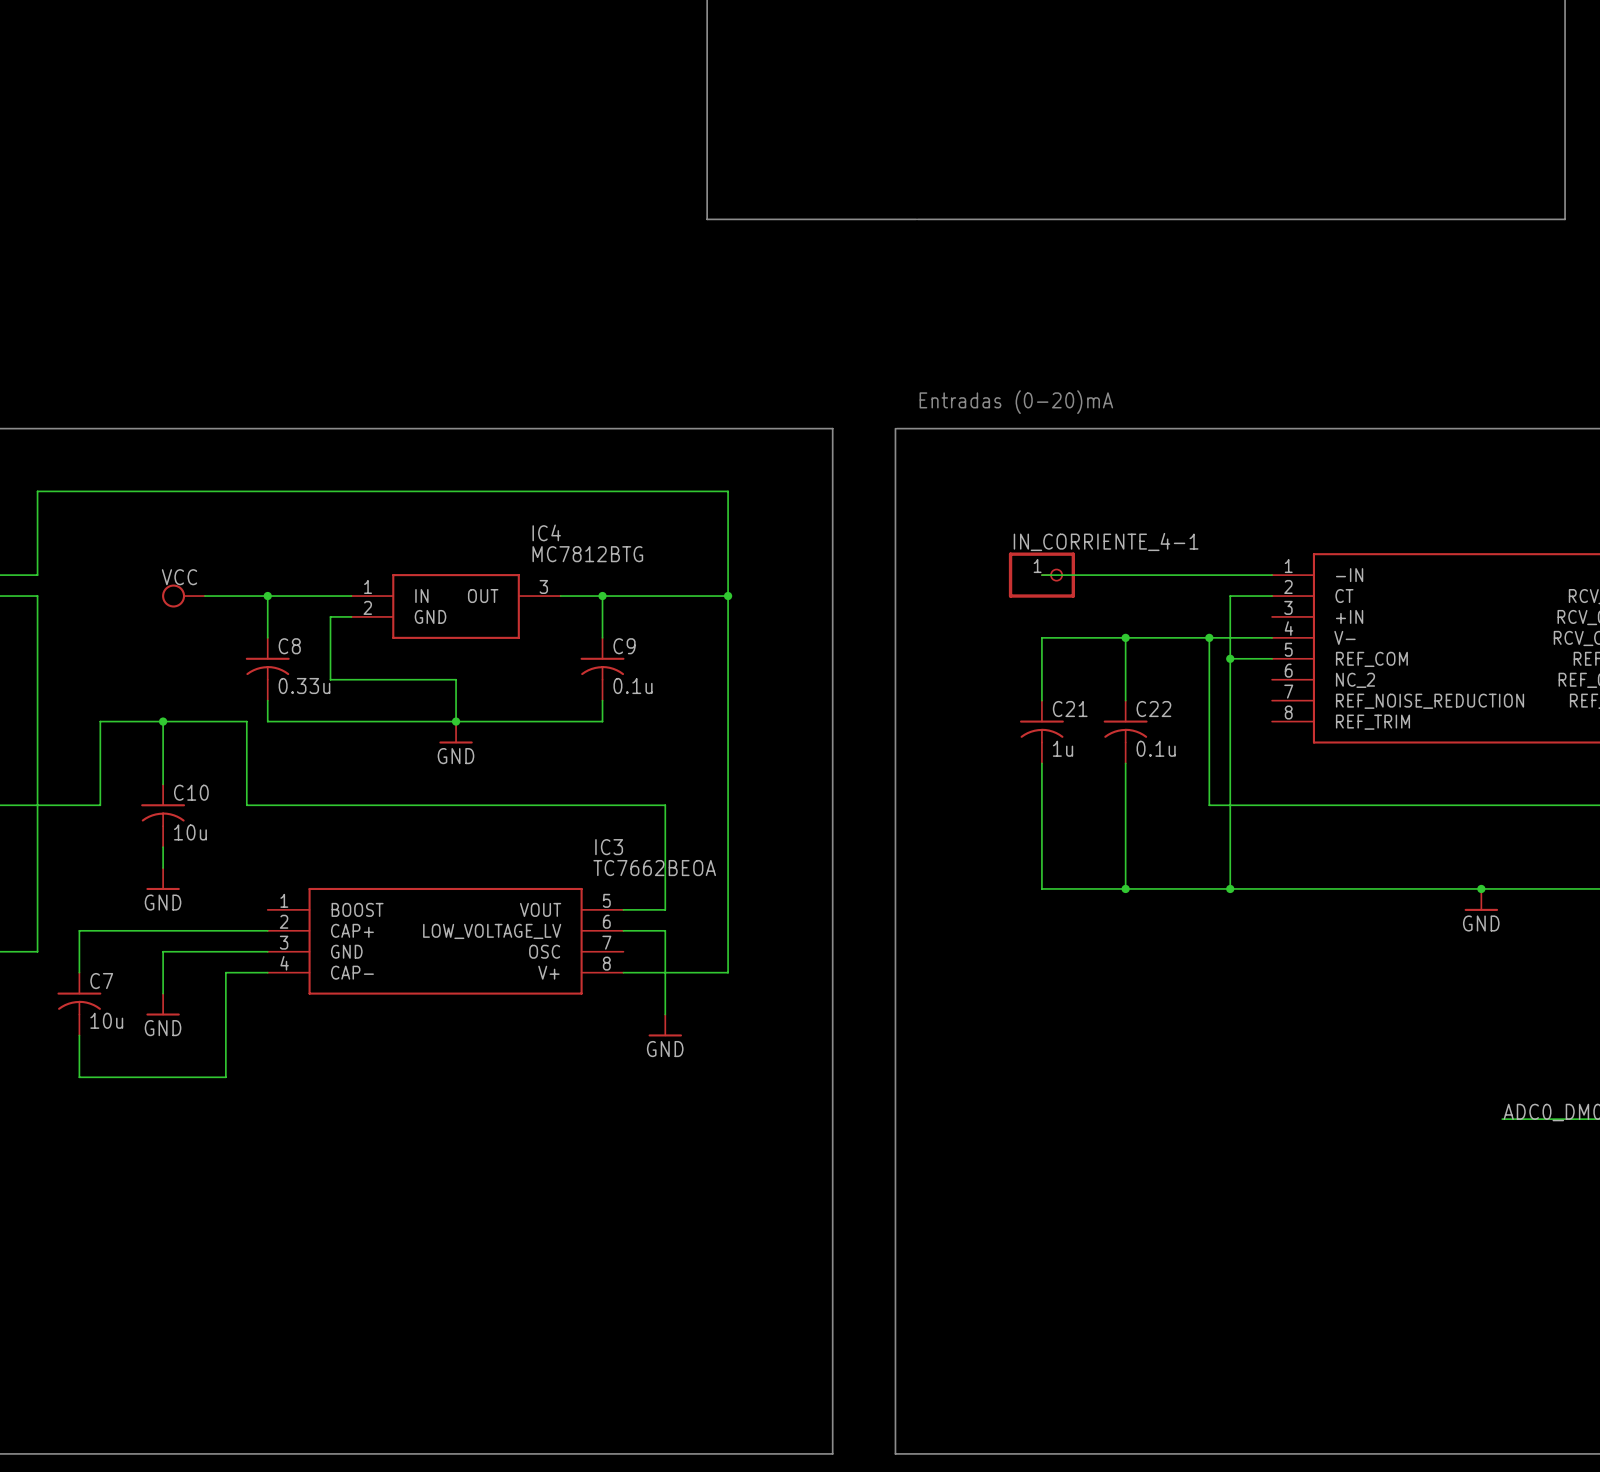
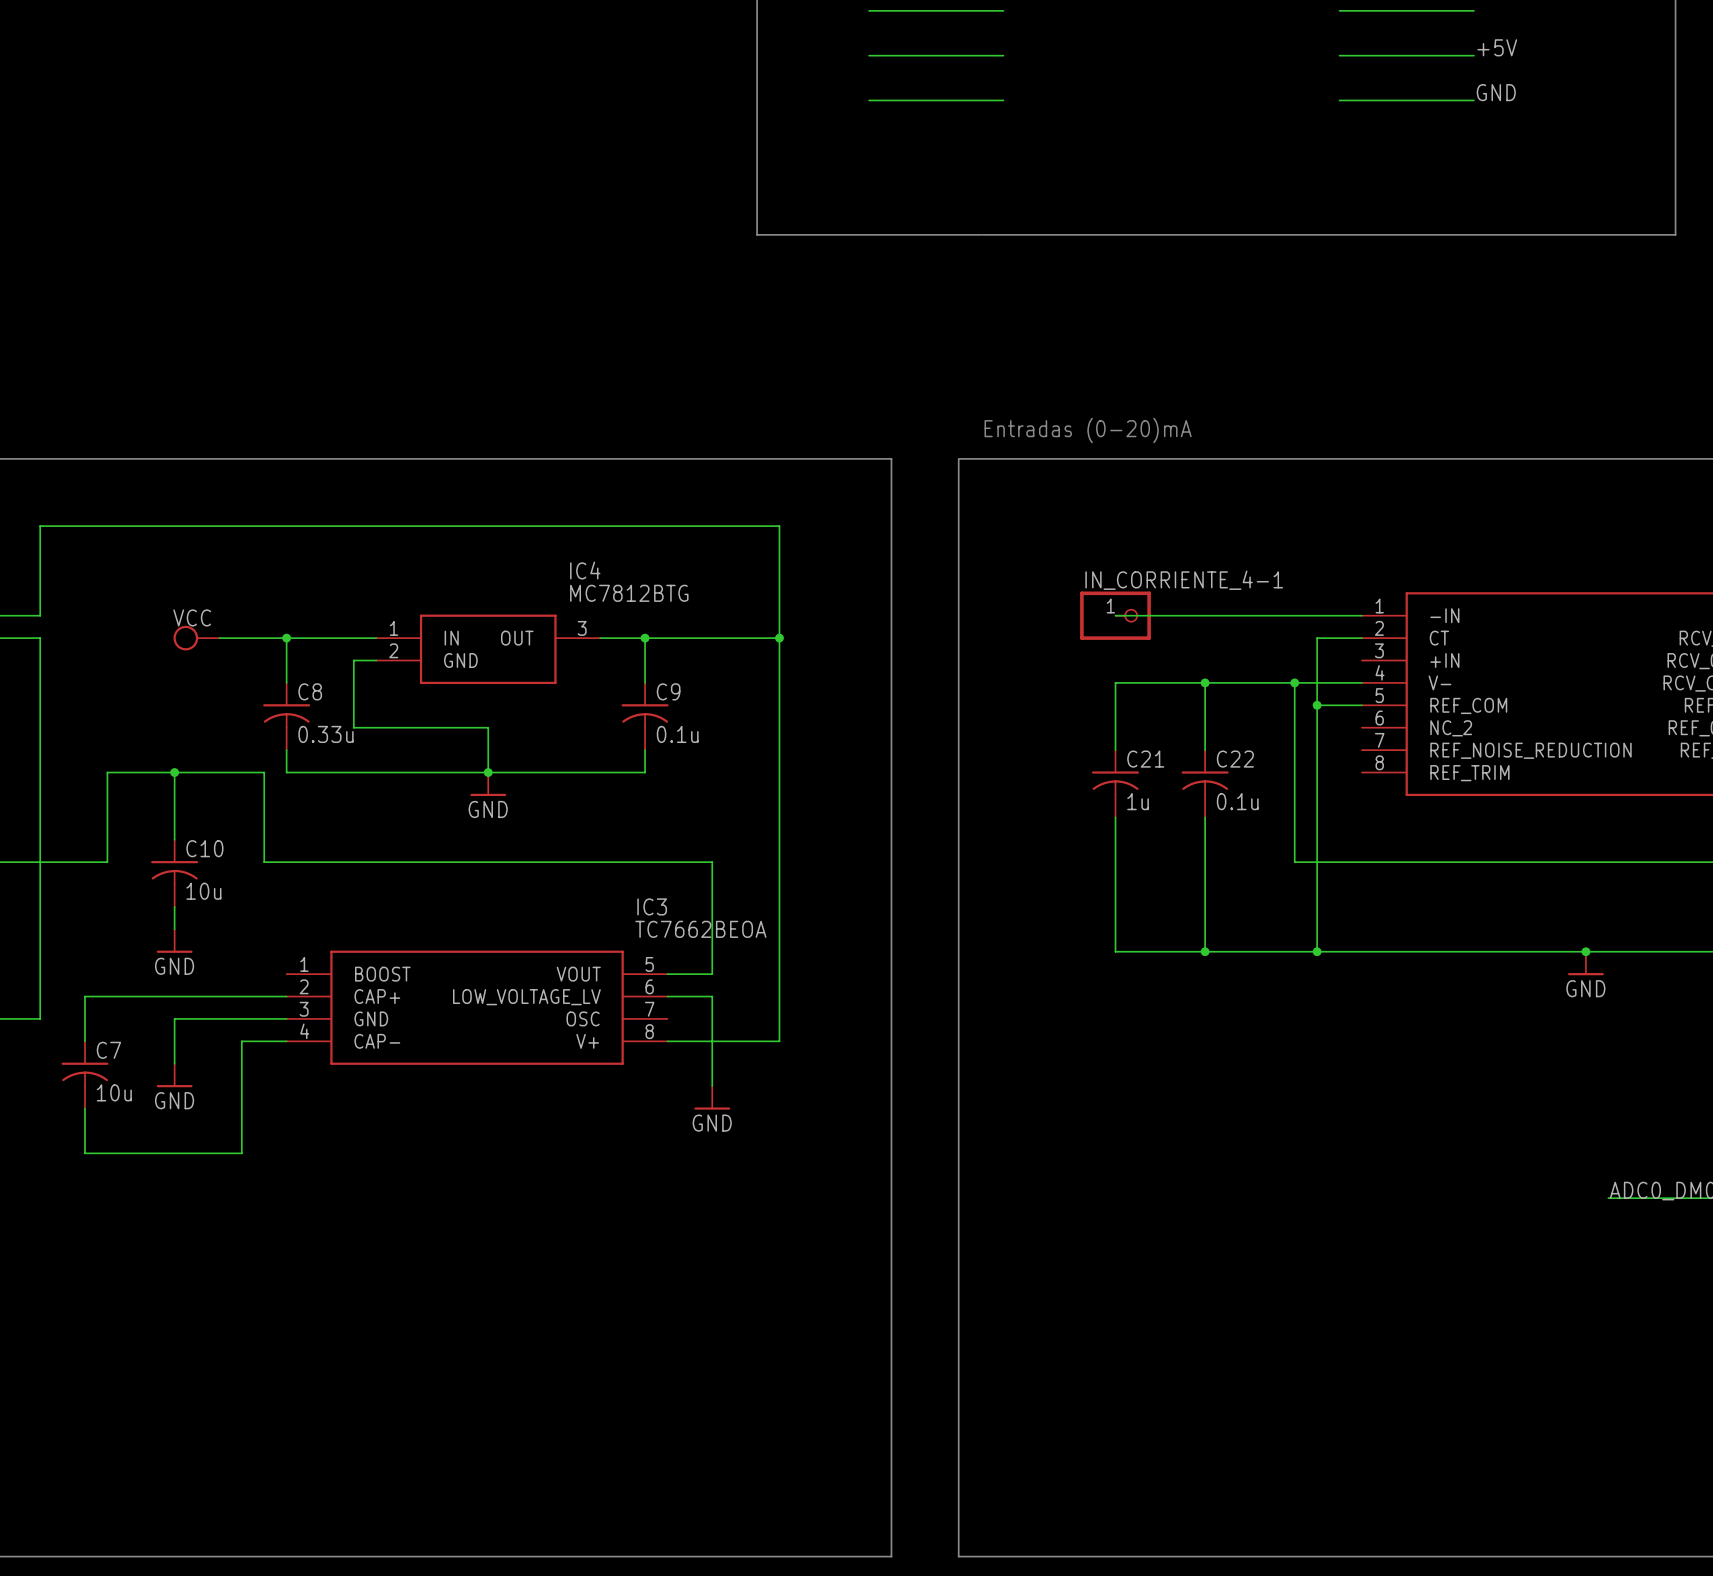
wire: none -> (869, 10) (1003, 10)
wire: none -> (1339, 10) (1473, 10)
label: none -> +5V (1497, 47)
wire: none -> (869, 55) (1003, 55)
wire: none -> (1339, 55) (1473, 55)
label: none -> GND (1496, 92)
wire: none -> (869, 100) (1003, 100)
wire: none -> (1339, 100) (1473, 100)

